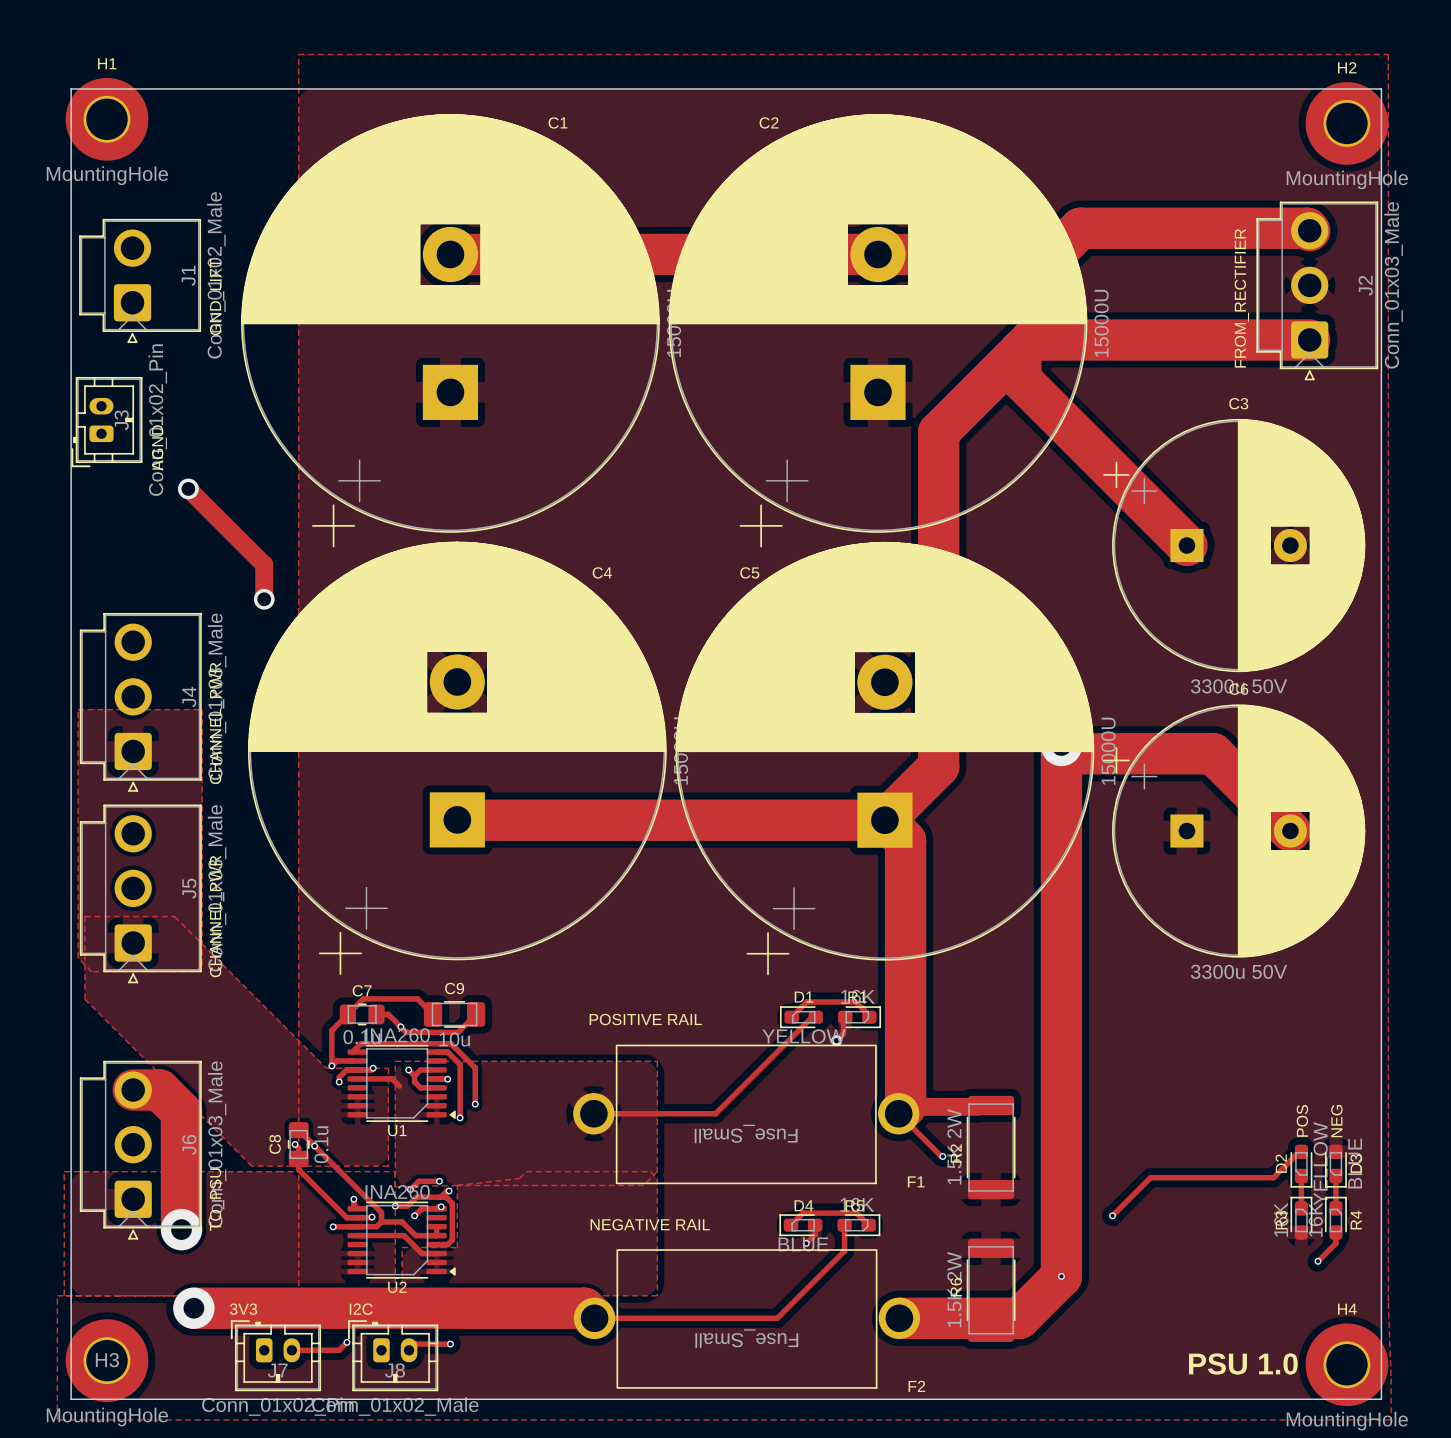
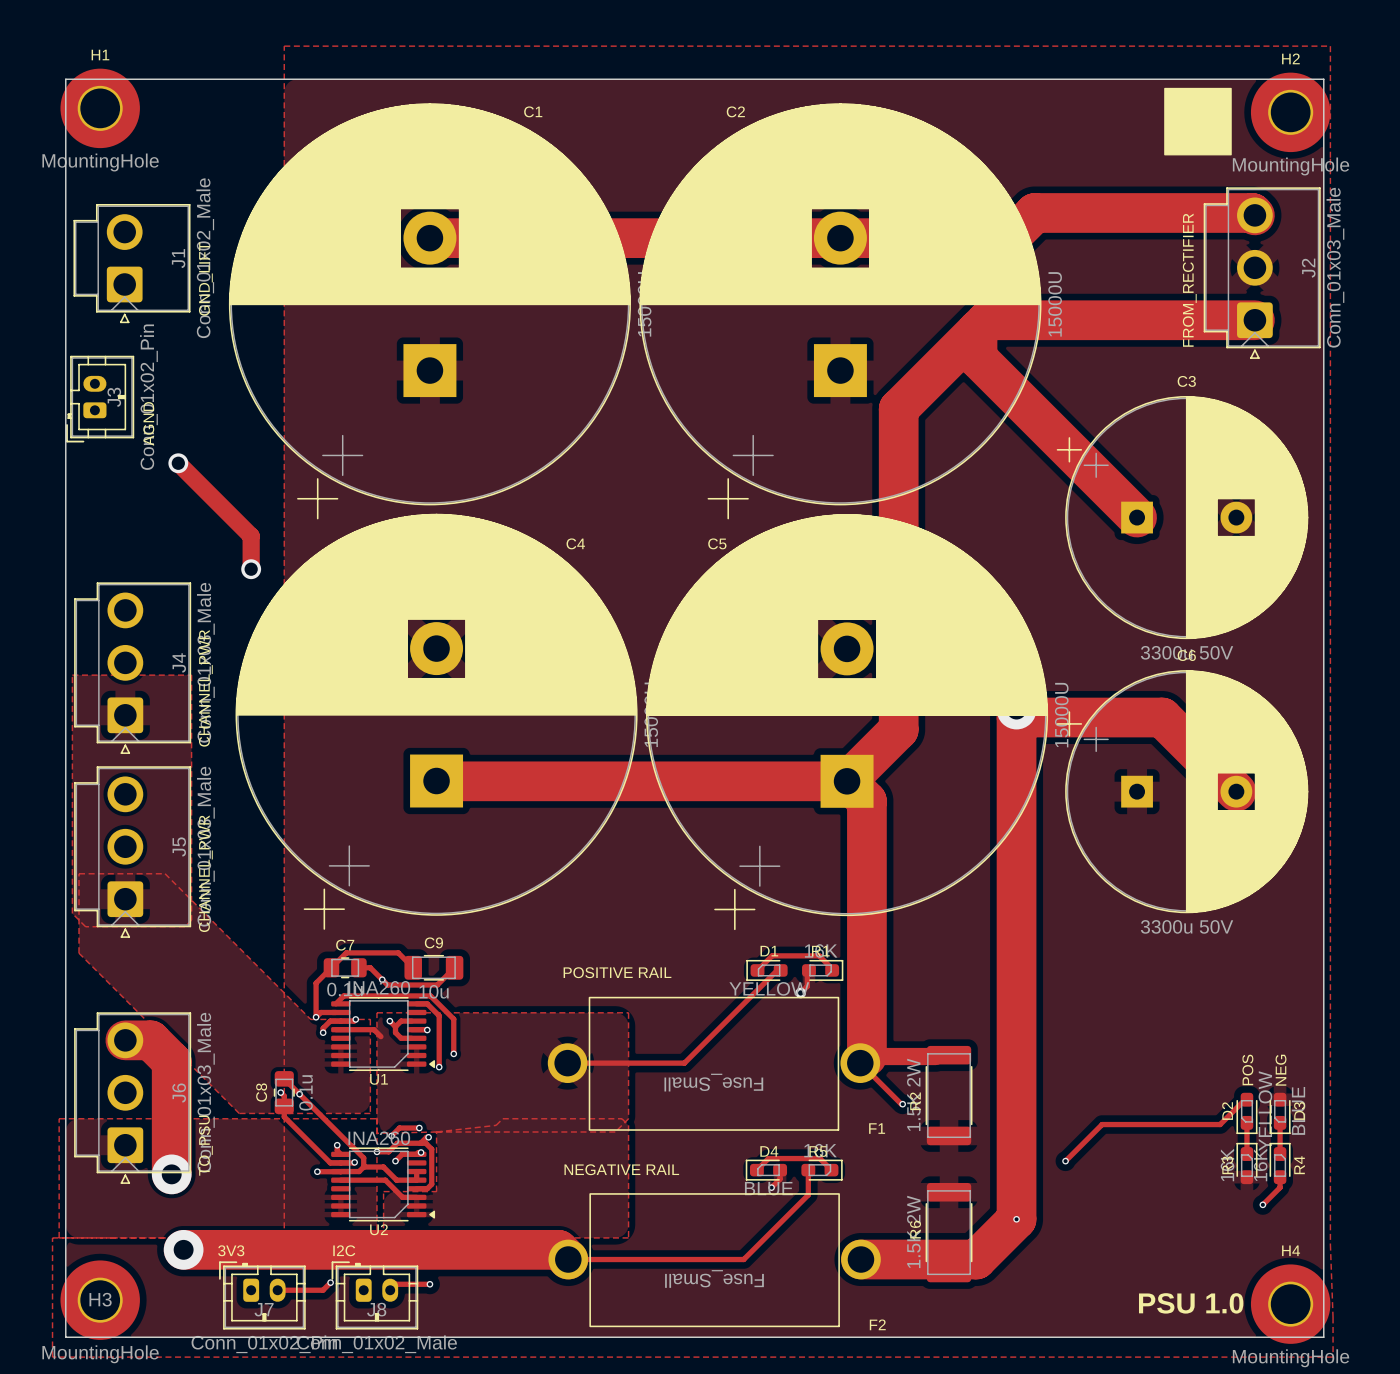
drawing: none -> [1164, 87, 1232, 156]

